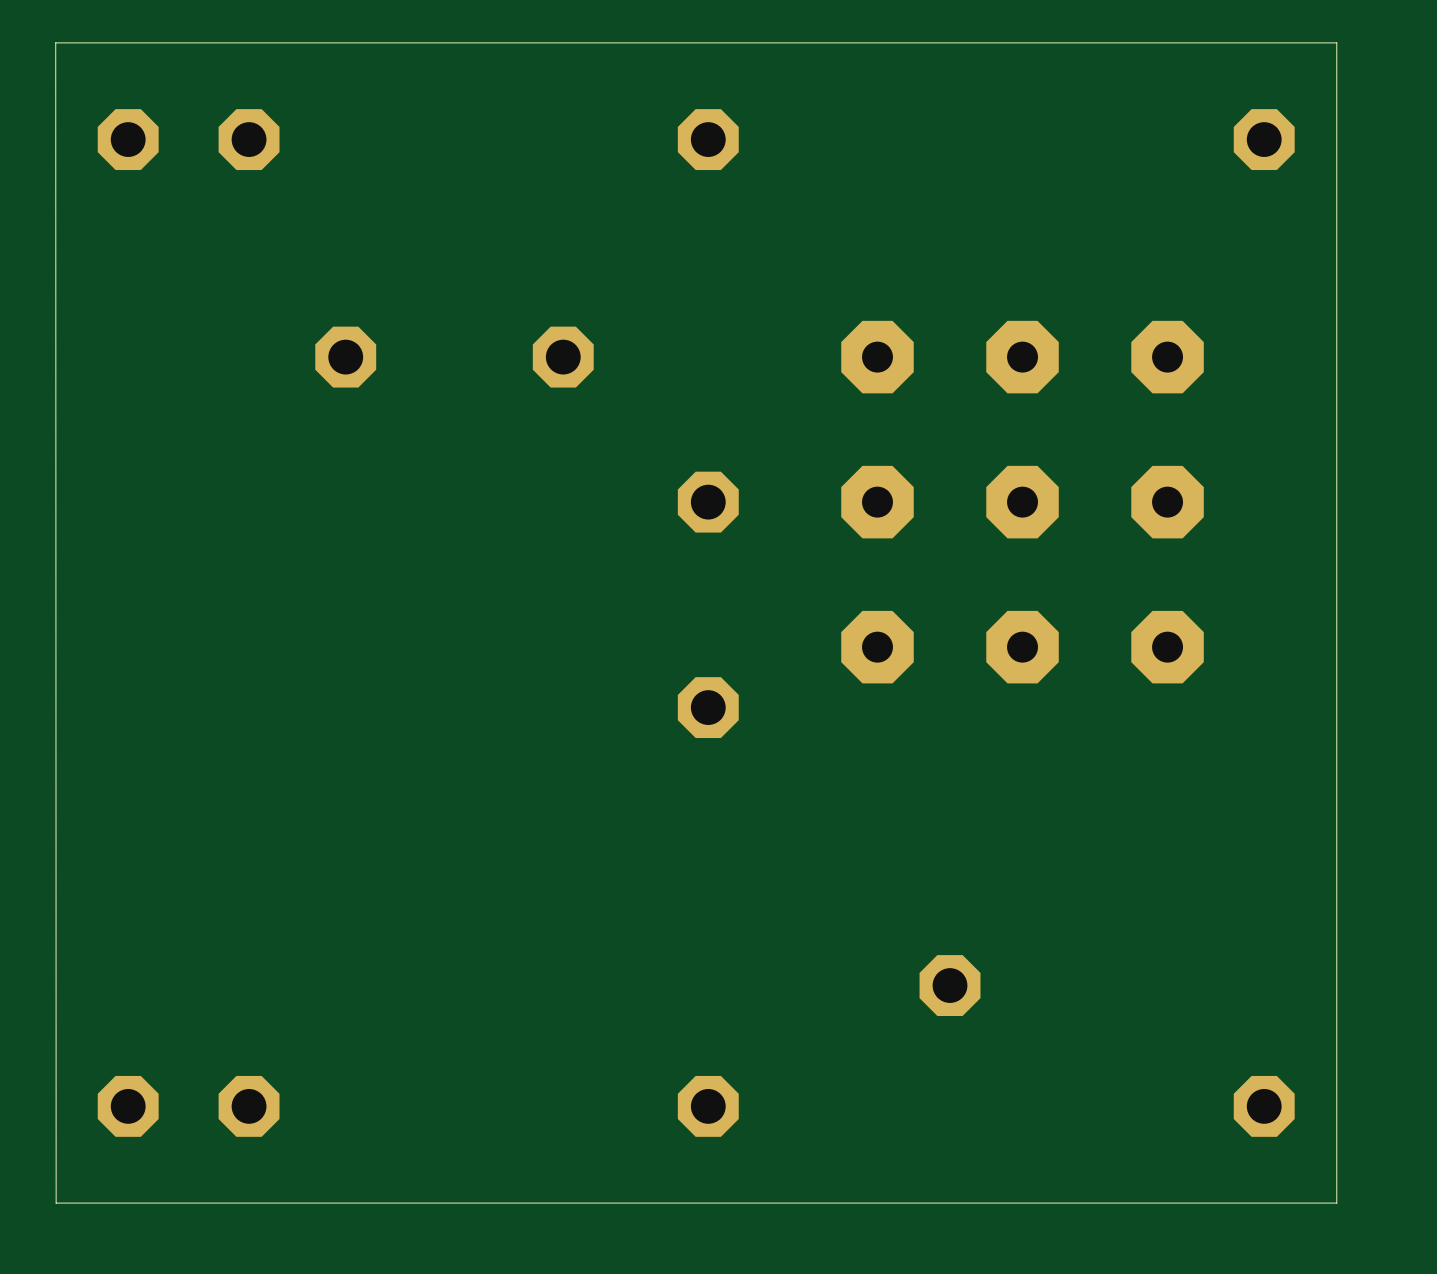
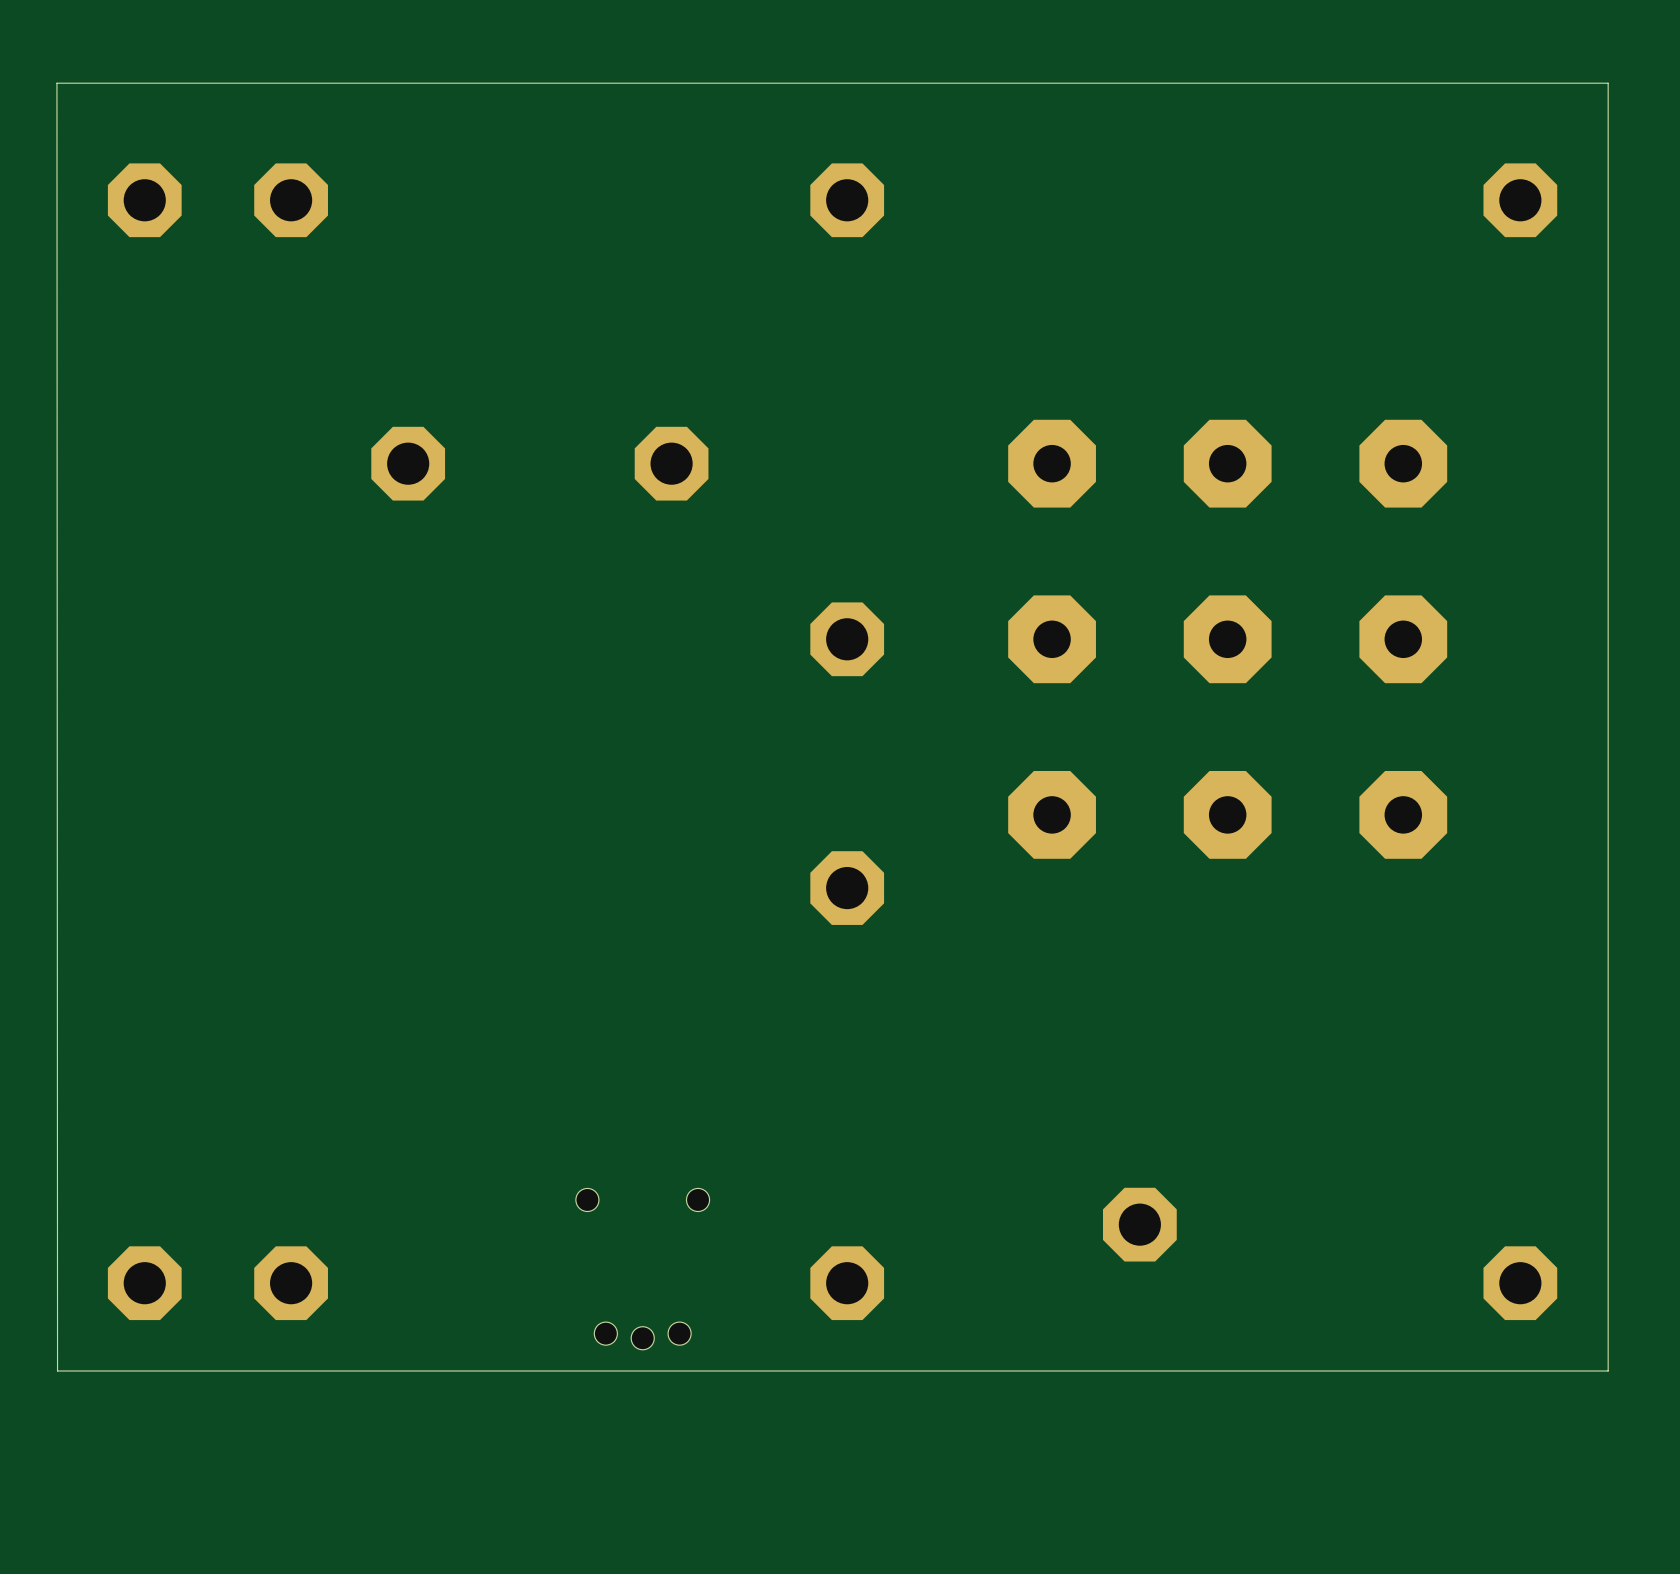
part: none -> (642, 1269)
part: none -> (144, 1283)
part: none -> (291, 1283)
part: (128, 1106) -> none
part: (249, 1106) -> none
part position: (708, 1106) -> (847, 1283)
part position: (1264, 1106) -> (1520, 1283)
board edge: (1336, 1106) (1336, 1203) (56, 1203) (56, 1106) -> (1608, 1370) (57, 1370)

